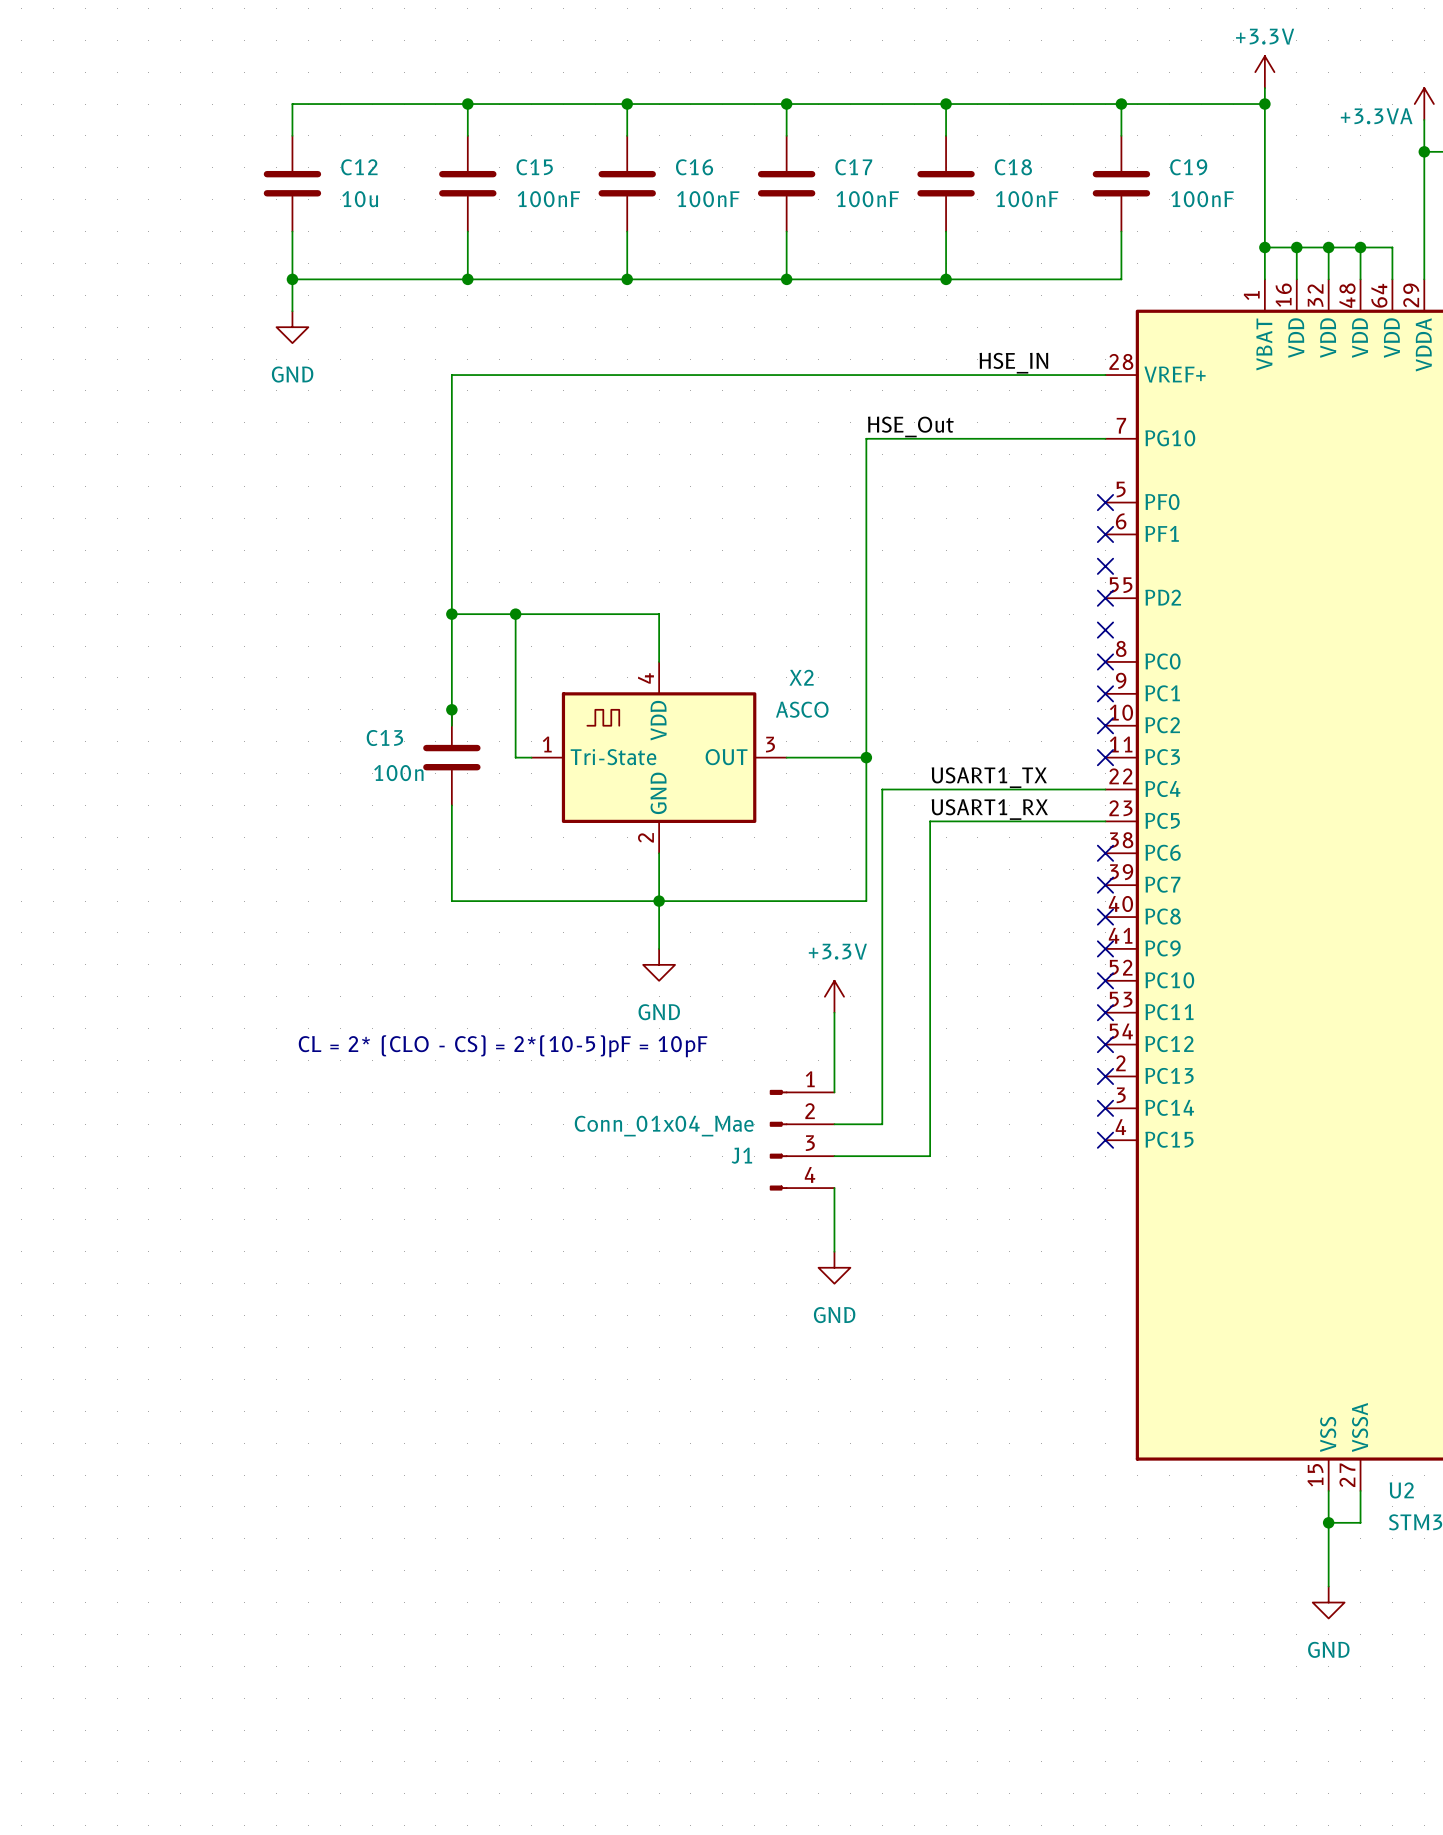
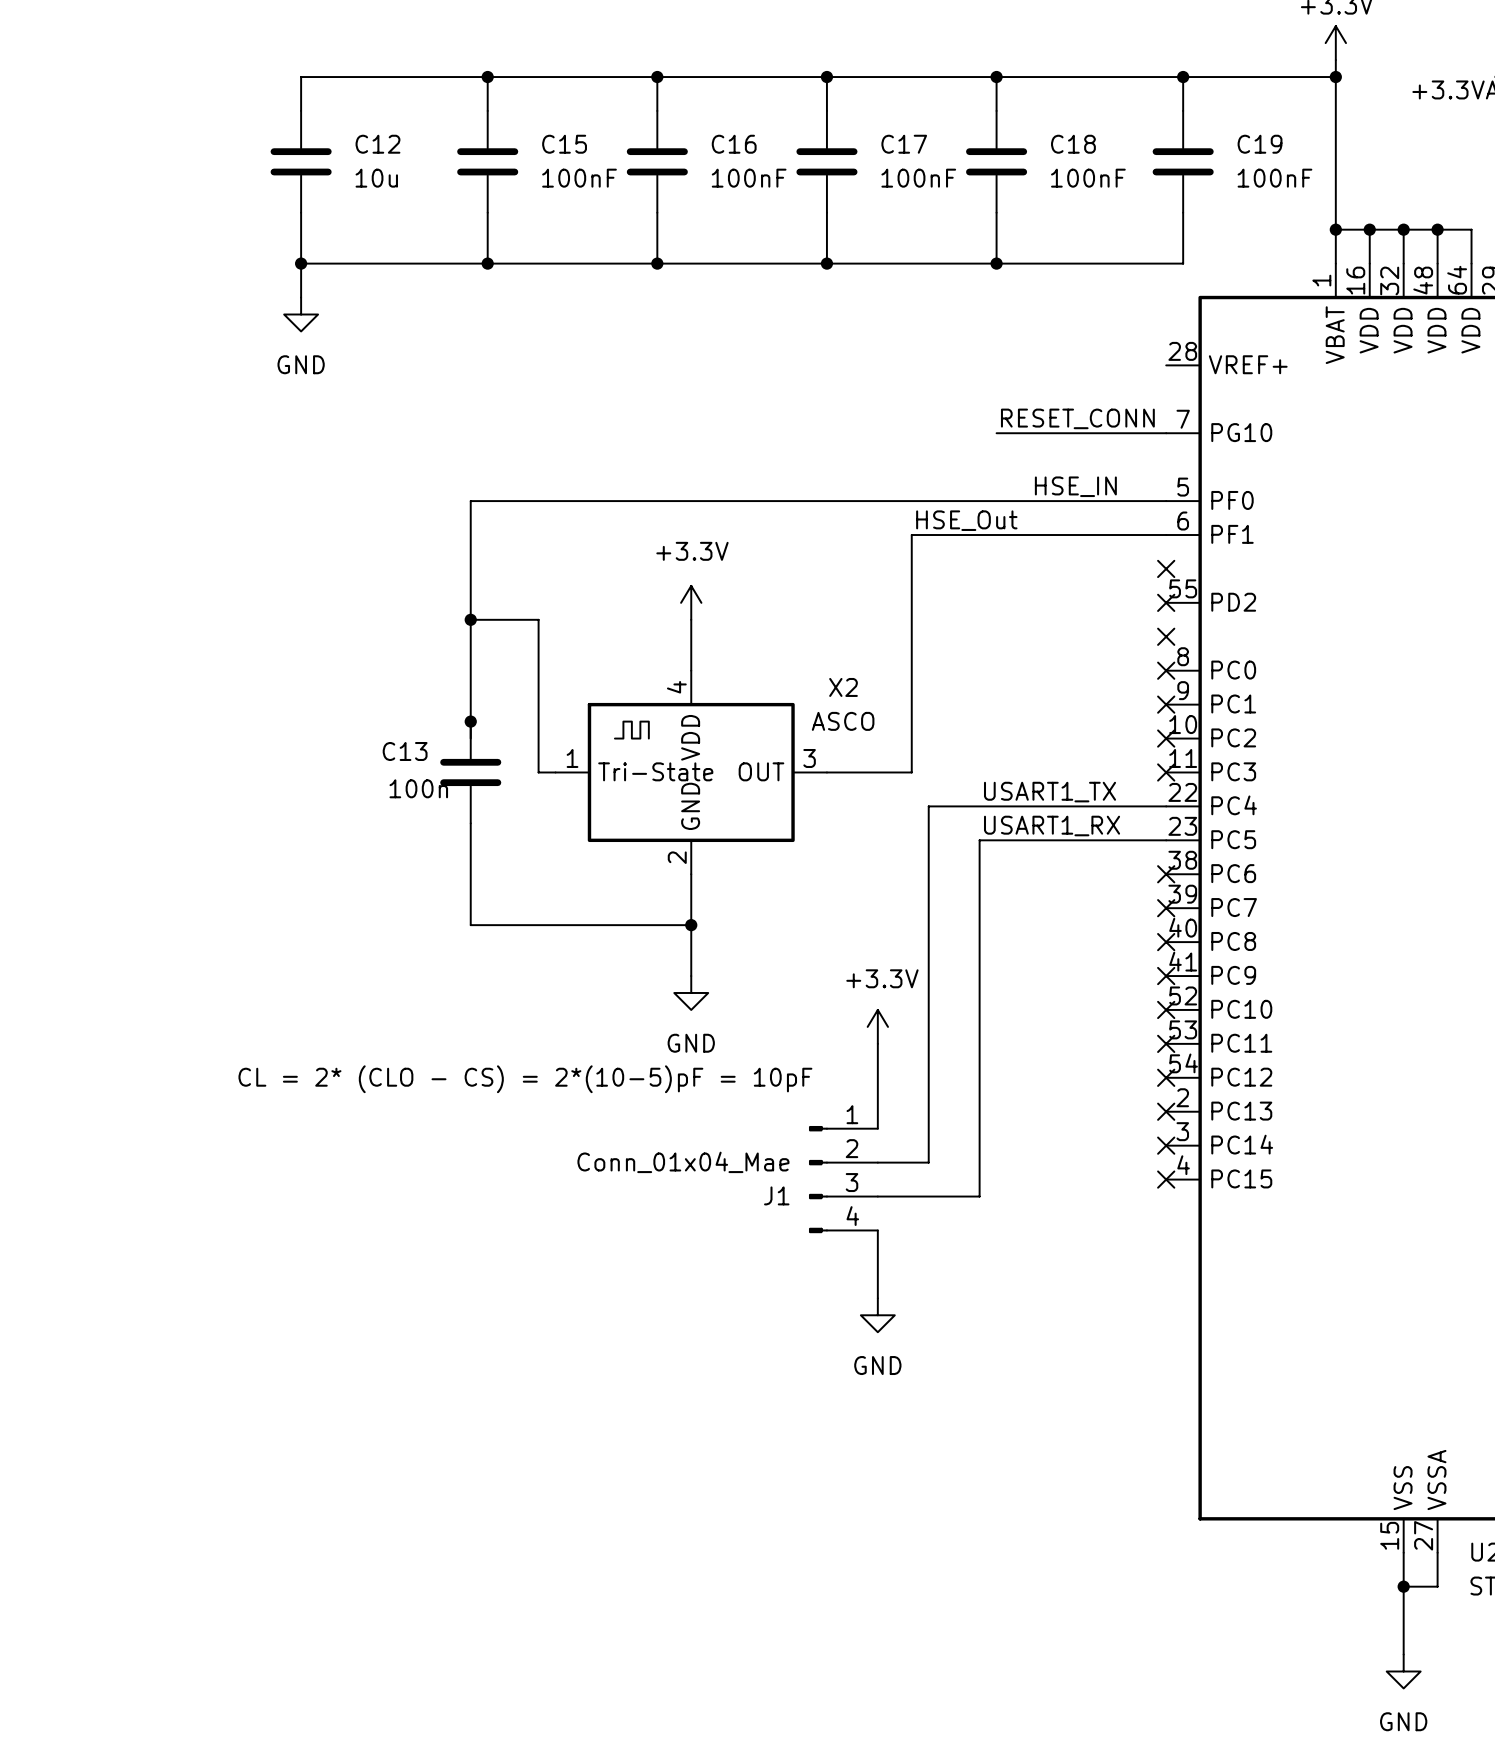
label position: HSE_IN (1013, 363) -> HSE_IN (1075, 486)
wire: (1105, 375) (451, 375) (451, 502) -> (1166, 501) (470, 501)
label position: HSE_Out (910, 426) -> HSE_Out (966, 520)
label: none -> RESET_CONN (1077, 418)
wire: (946, 438) (866, 438) (866, 534) -> (1166, 535) (911, 535)
no-connect mark: (1105, 502) -> none
no-connect mark: (1105, 534) -> none
power symbol: none -> +3.3V (691, 602)
wire: (515, 614) (659, 614) -> none
junction: (515, 614) -> none
wire: (866, 757) (866, 901) (659, 901) -> none
junction: (866, 757) -> none

